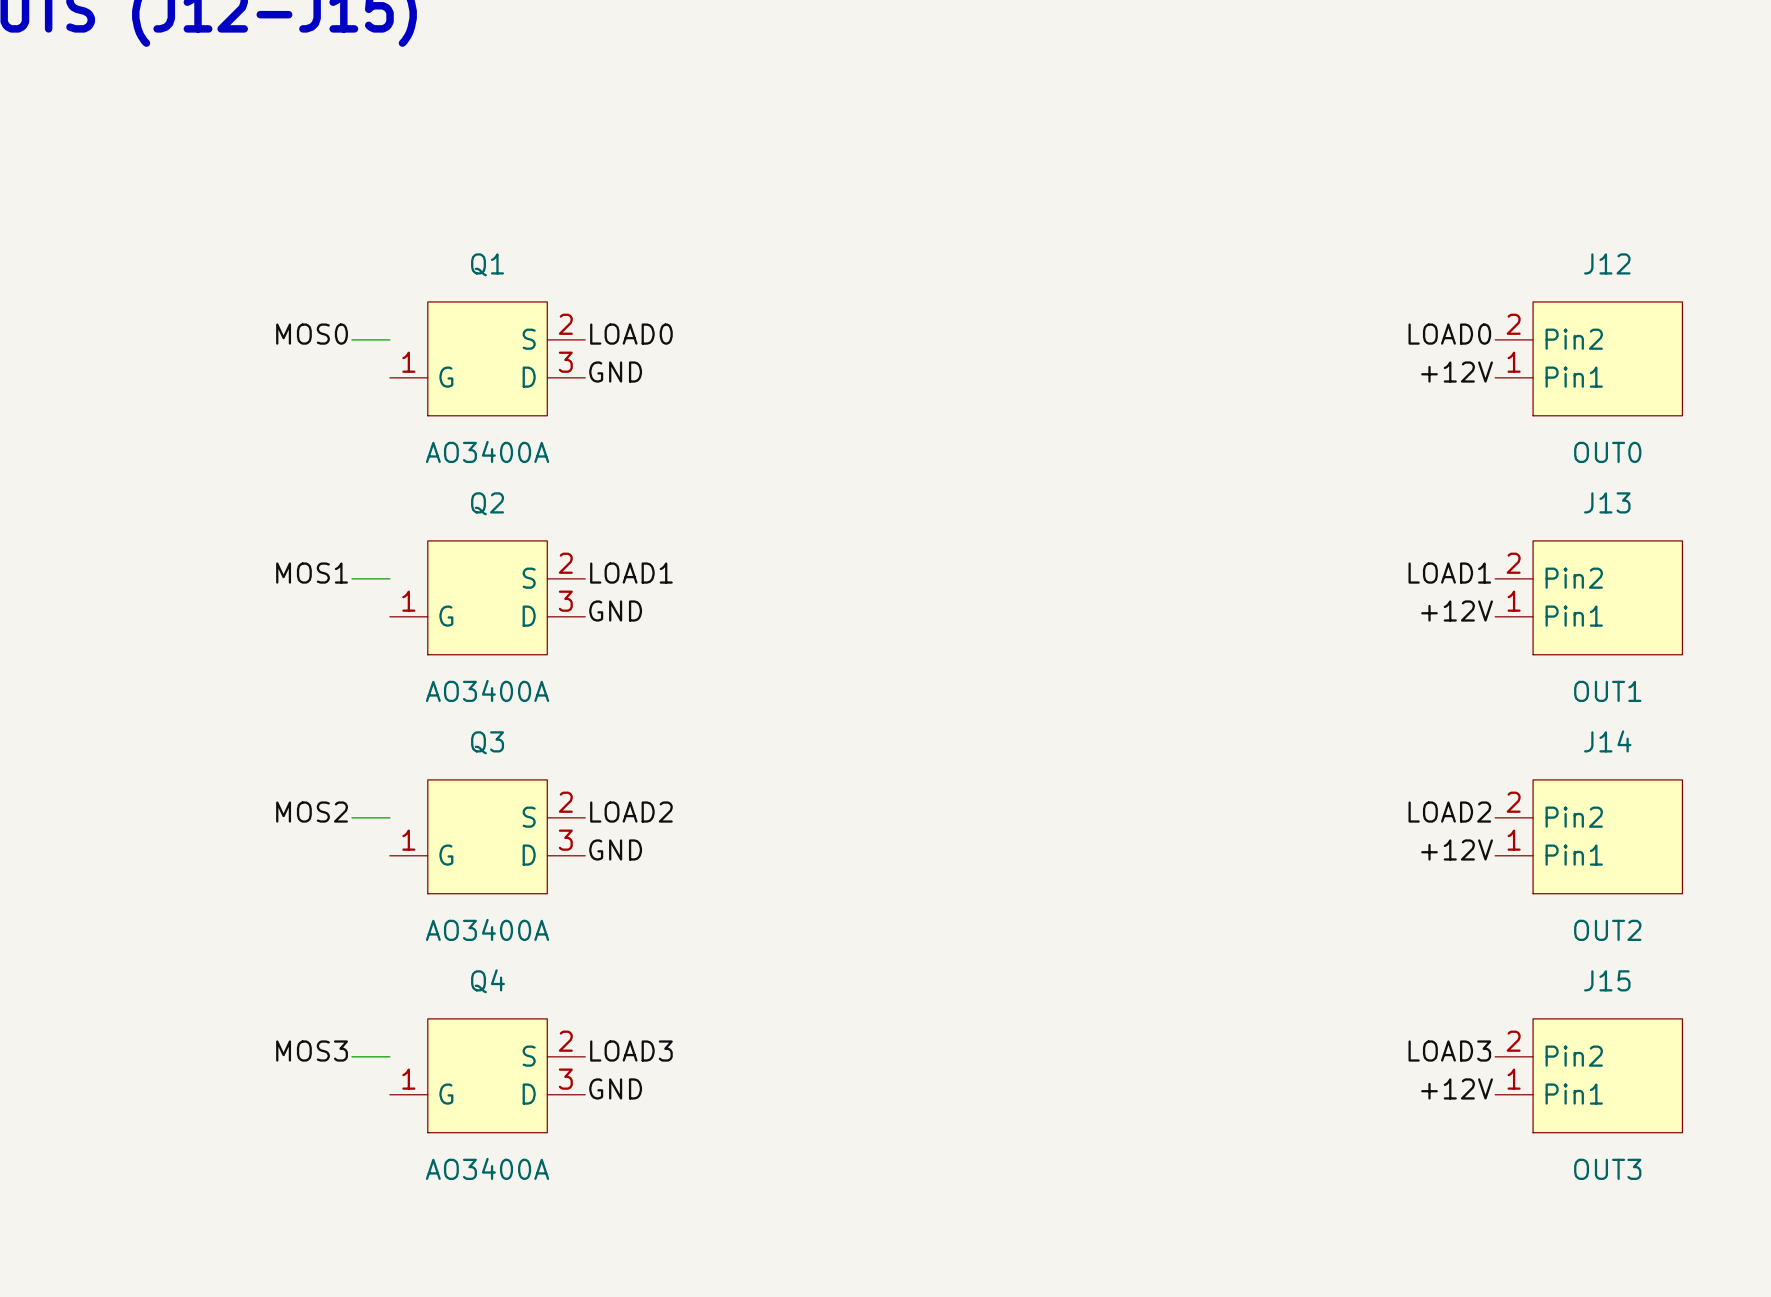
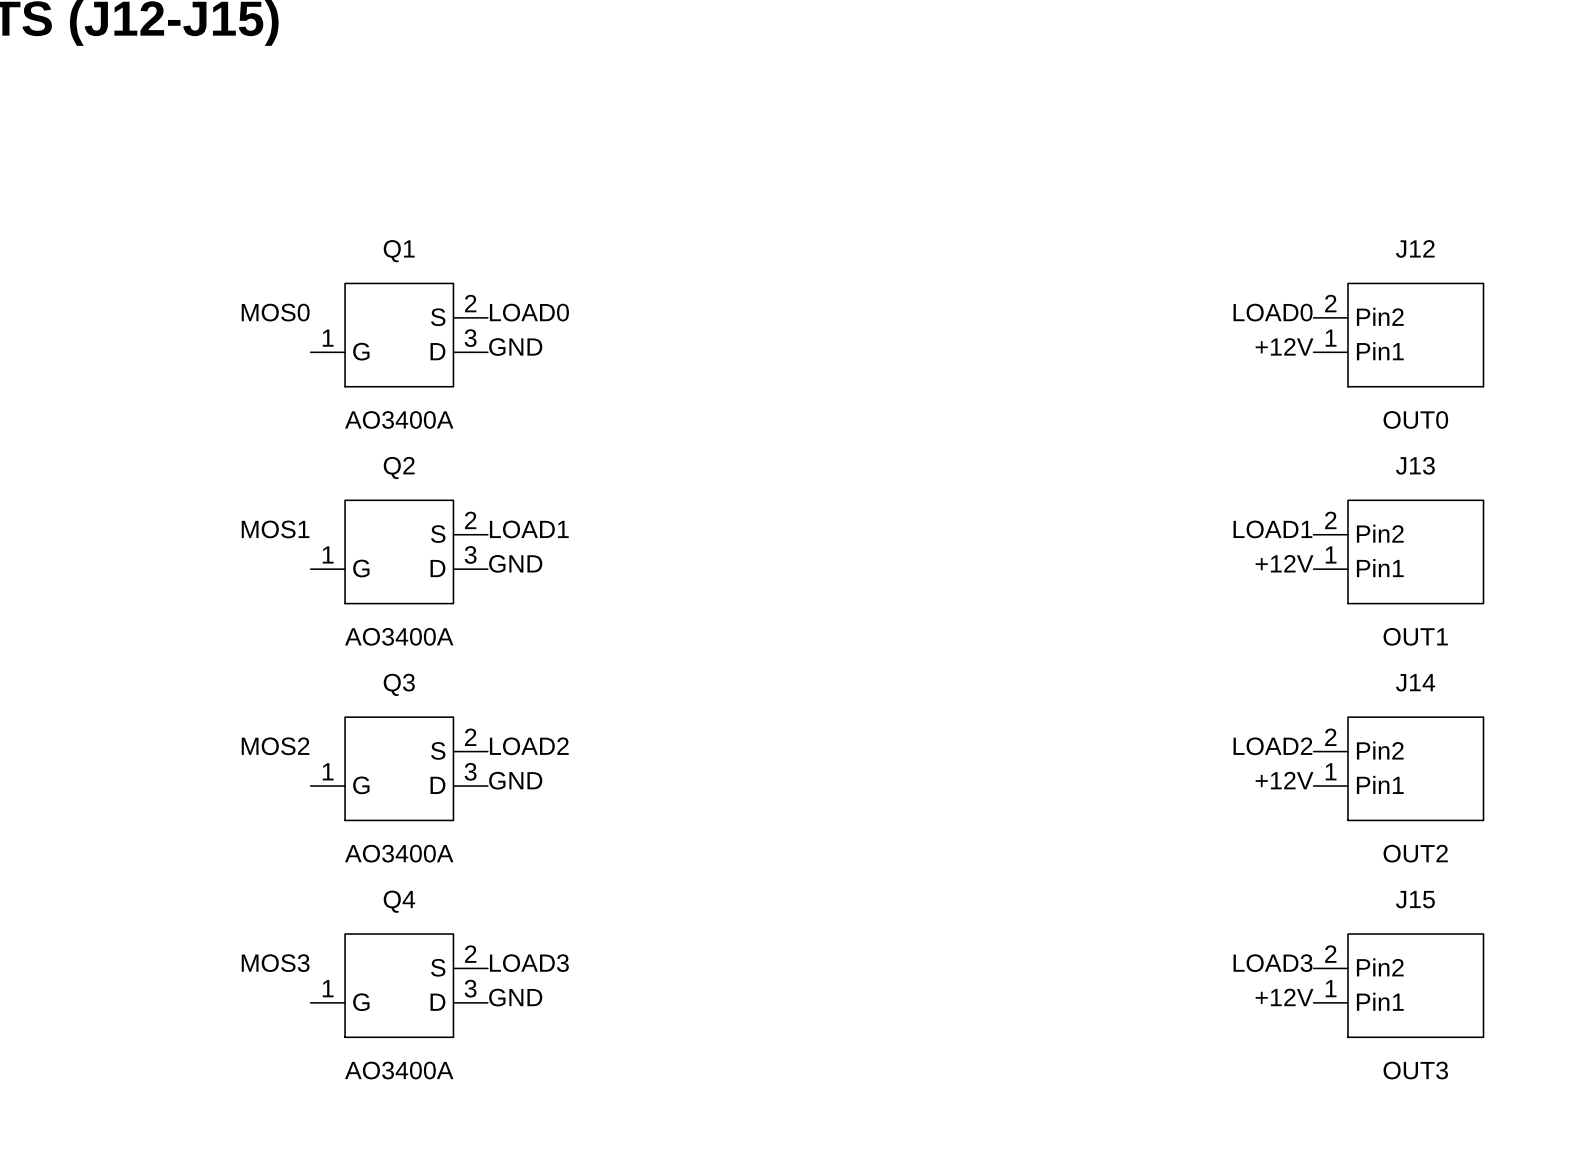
label position: MOS0 (312, 334) -> MOS0 (275, 312)
wire: (351, 339) (389, 339) -> none
label position: MOS1 (312, 573) -> MOS1 (275, 529)
wire: (351, 578) (389, 578) -> none
label position: MOS2 (312, 812) -> MOS2 (275, 746)
wire: (351, 817) (389, 817) -> none
label position: MOS3 (312, 1051) -> MOS3 (275, 963)
wire: (351, 1056) (389, 1056) -> none

